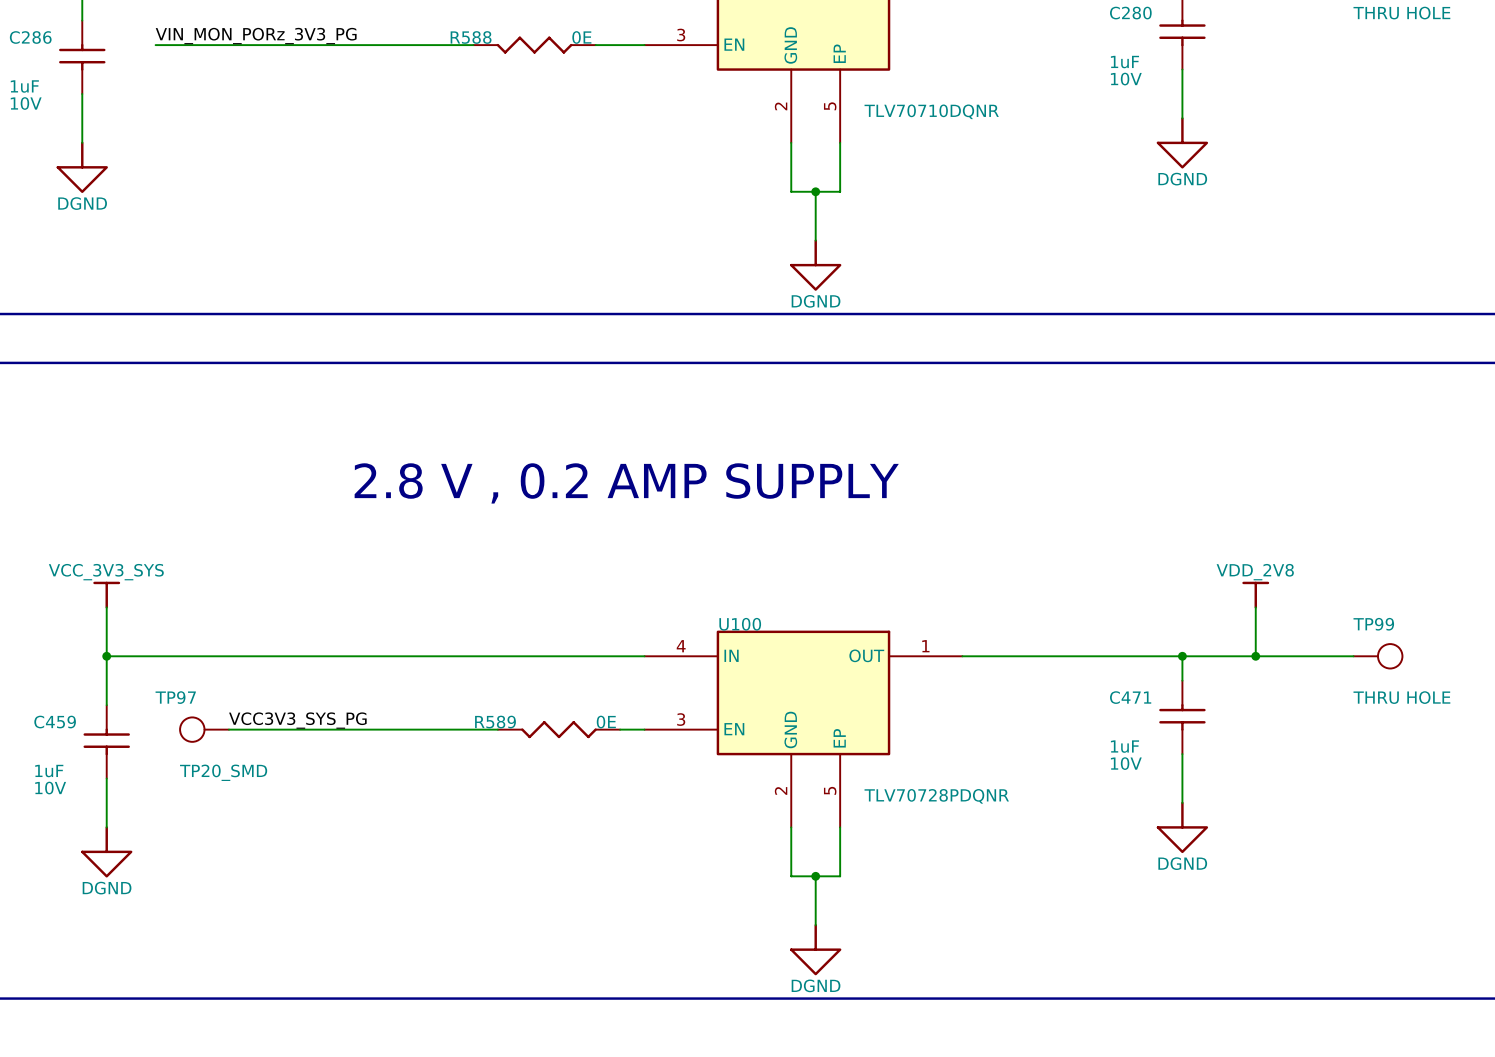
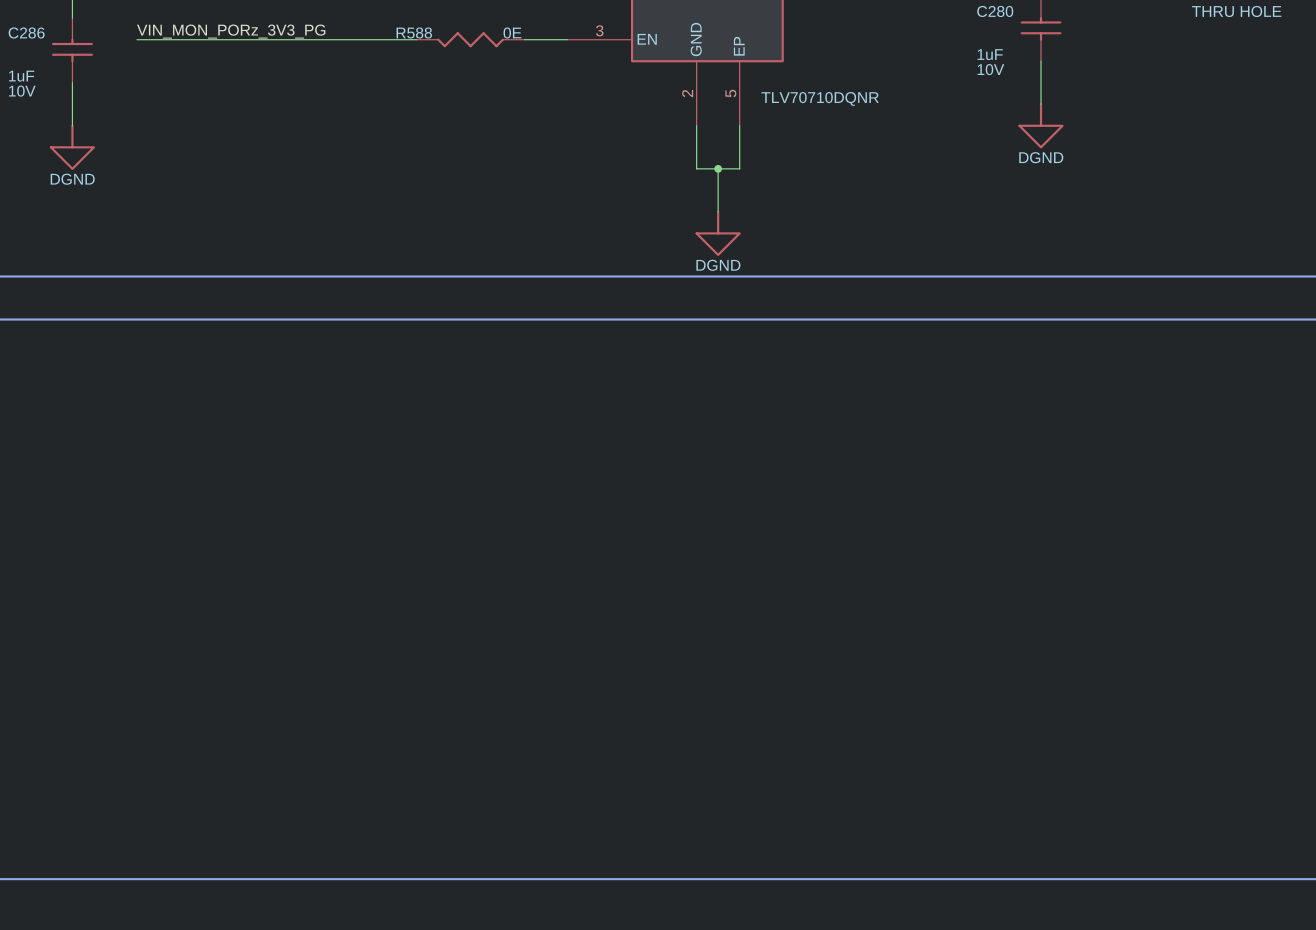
text: 2.8 V , 0.2 AMP SUPPLY (626, 483) -> none
power symbol: VCC_3V3_SYS (106, 595) -> none
power symbol: VDD_2V8 (1255, 595) -> none
wire: (106, 607) (106, 705) -> none
wire: (1255, 607) (1255, 656) -> none
wire: (106, 656) (644, 656) -> none
junction: (106, 656) -> none
wire: (962, 656) (1353, 656) -> none
wire: (1182, 656) (1182, 680) -> none
junction: (1182, 656) -> none
junction: (1255, 656) -> none
TP99: THRU HOLE (1378, 656) -> none
C471: 1uF (1182, 717) -> none
label: VCC3V3_SYS_PG (297, 720) -> none
TP97: TP20_SMD (204, 729) -> none
wire: (228, 729) (497, 729) -> none
R589: 0E (559, 729) -> none
wire: (620, 729) (644, 729) -> none
U100: TLV70728PDQNR (803, 729) -> none
C459: 1uF (106, 741) -> none
wire: (1182, 754) (1182, 802) -> none
wire: (106, 778) (106, 827) -> none
wire: (791, 827) (791, 876) (840, 876) (840, 827) -> none
power symbol: DGND (1182, 827) -> none
power symbol: DGND (106, 851) -> none
wire: (815, 876) (815, 925) -> none
junction: (815, 876) -> none
power symbol: DGND (815, 949) -> none

